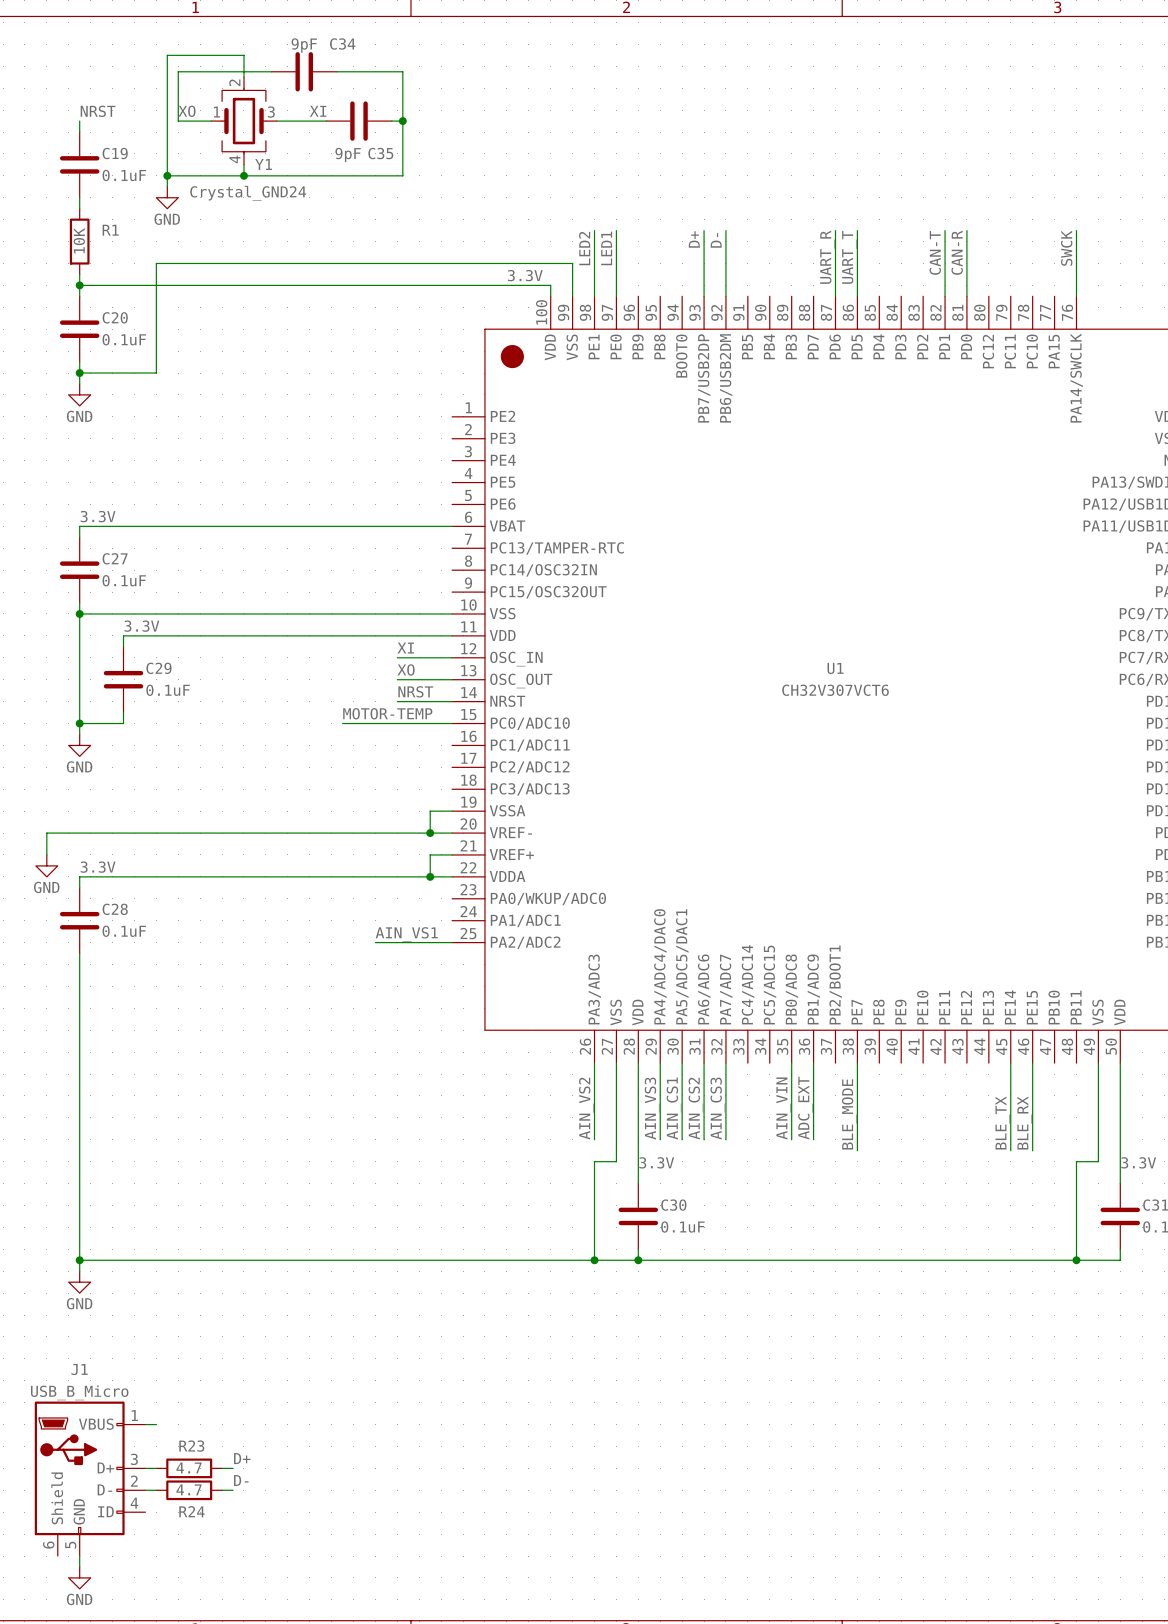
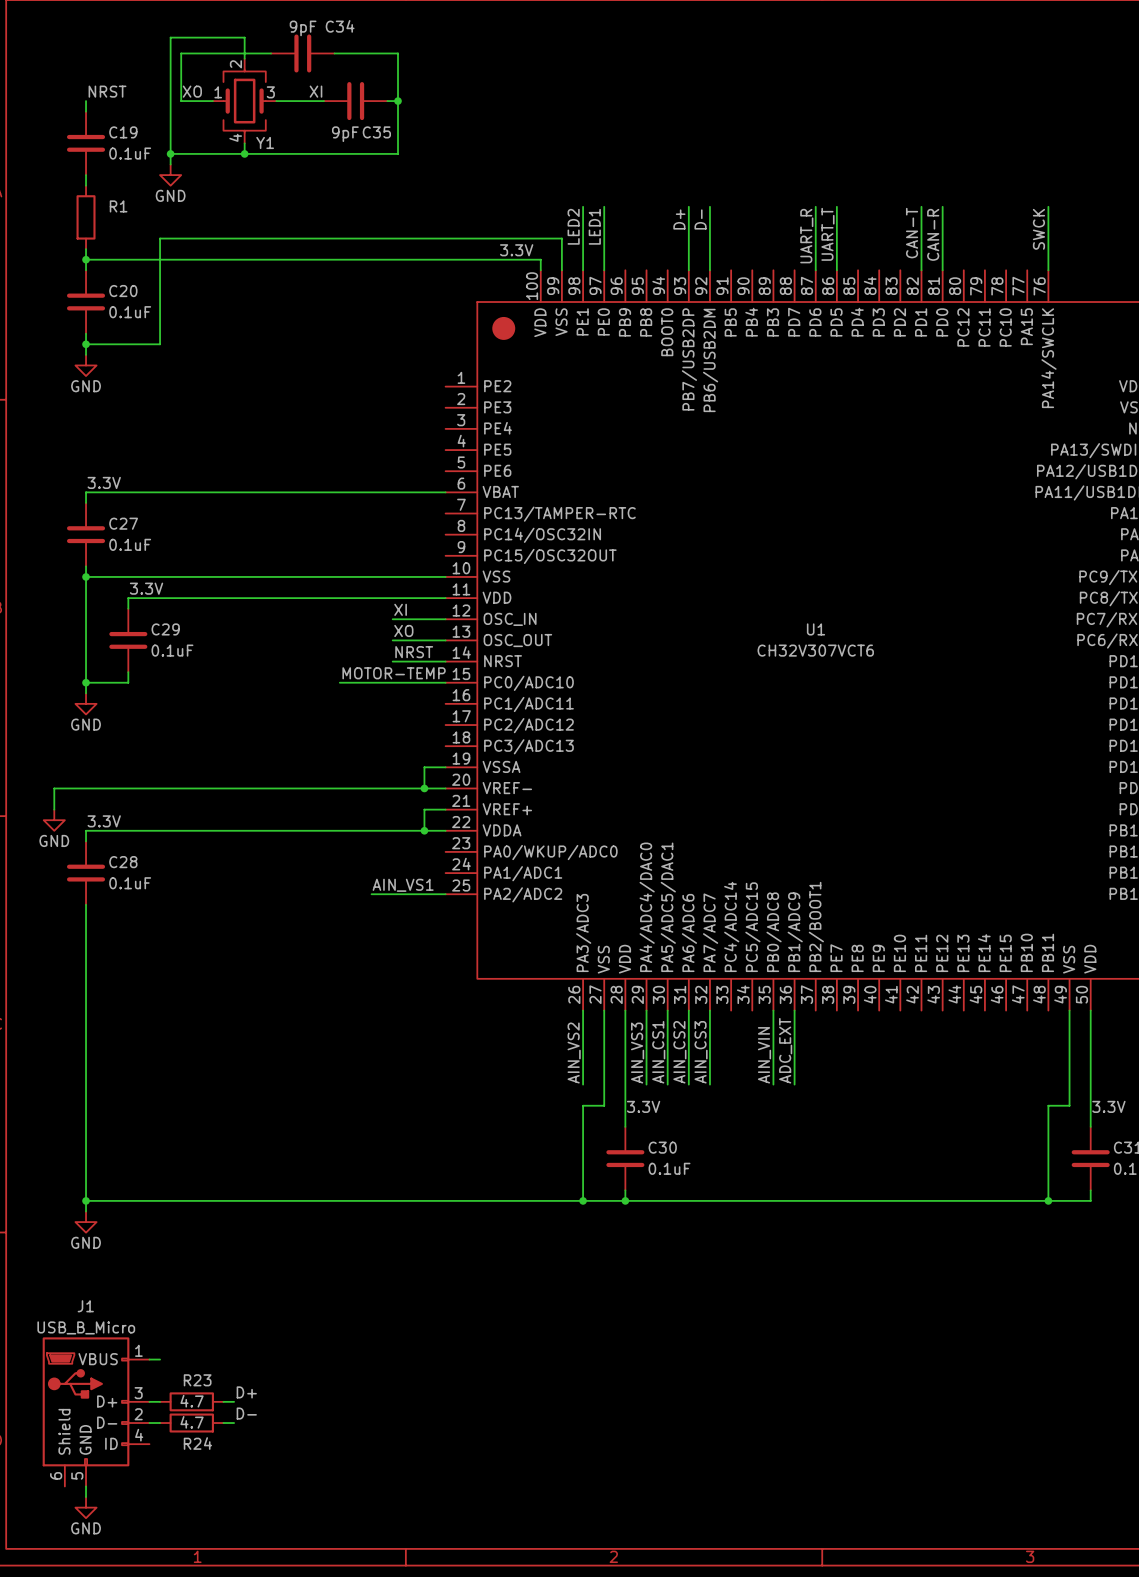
Y1 value: Crystal_GND24 (248, 193) -> none
R1 value: 10K (79, 240) -> none
wire: (857, 1063) (857, 1150) -> none
wire: (1010, 1063) (1010, 1150) -> none
wire: (1032, 1063) (1032, 1150) -> none
label: BLE_MODE (849, 1114) -> none
label: BLE_TX (1002, 1123) -> none
label: BLE_RX (1024, 1123) -> none

